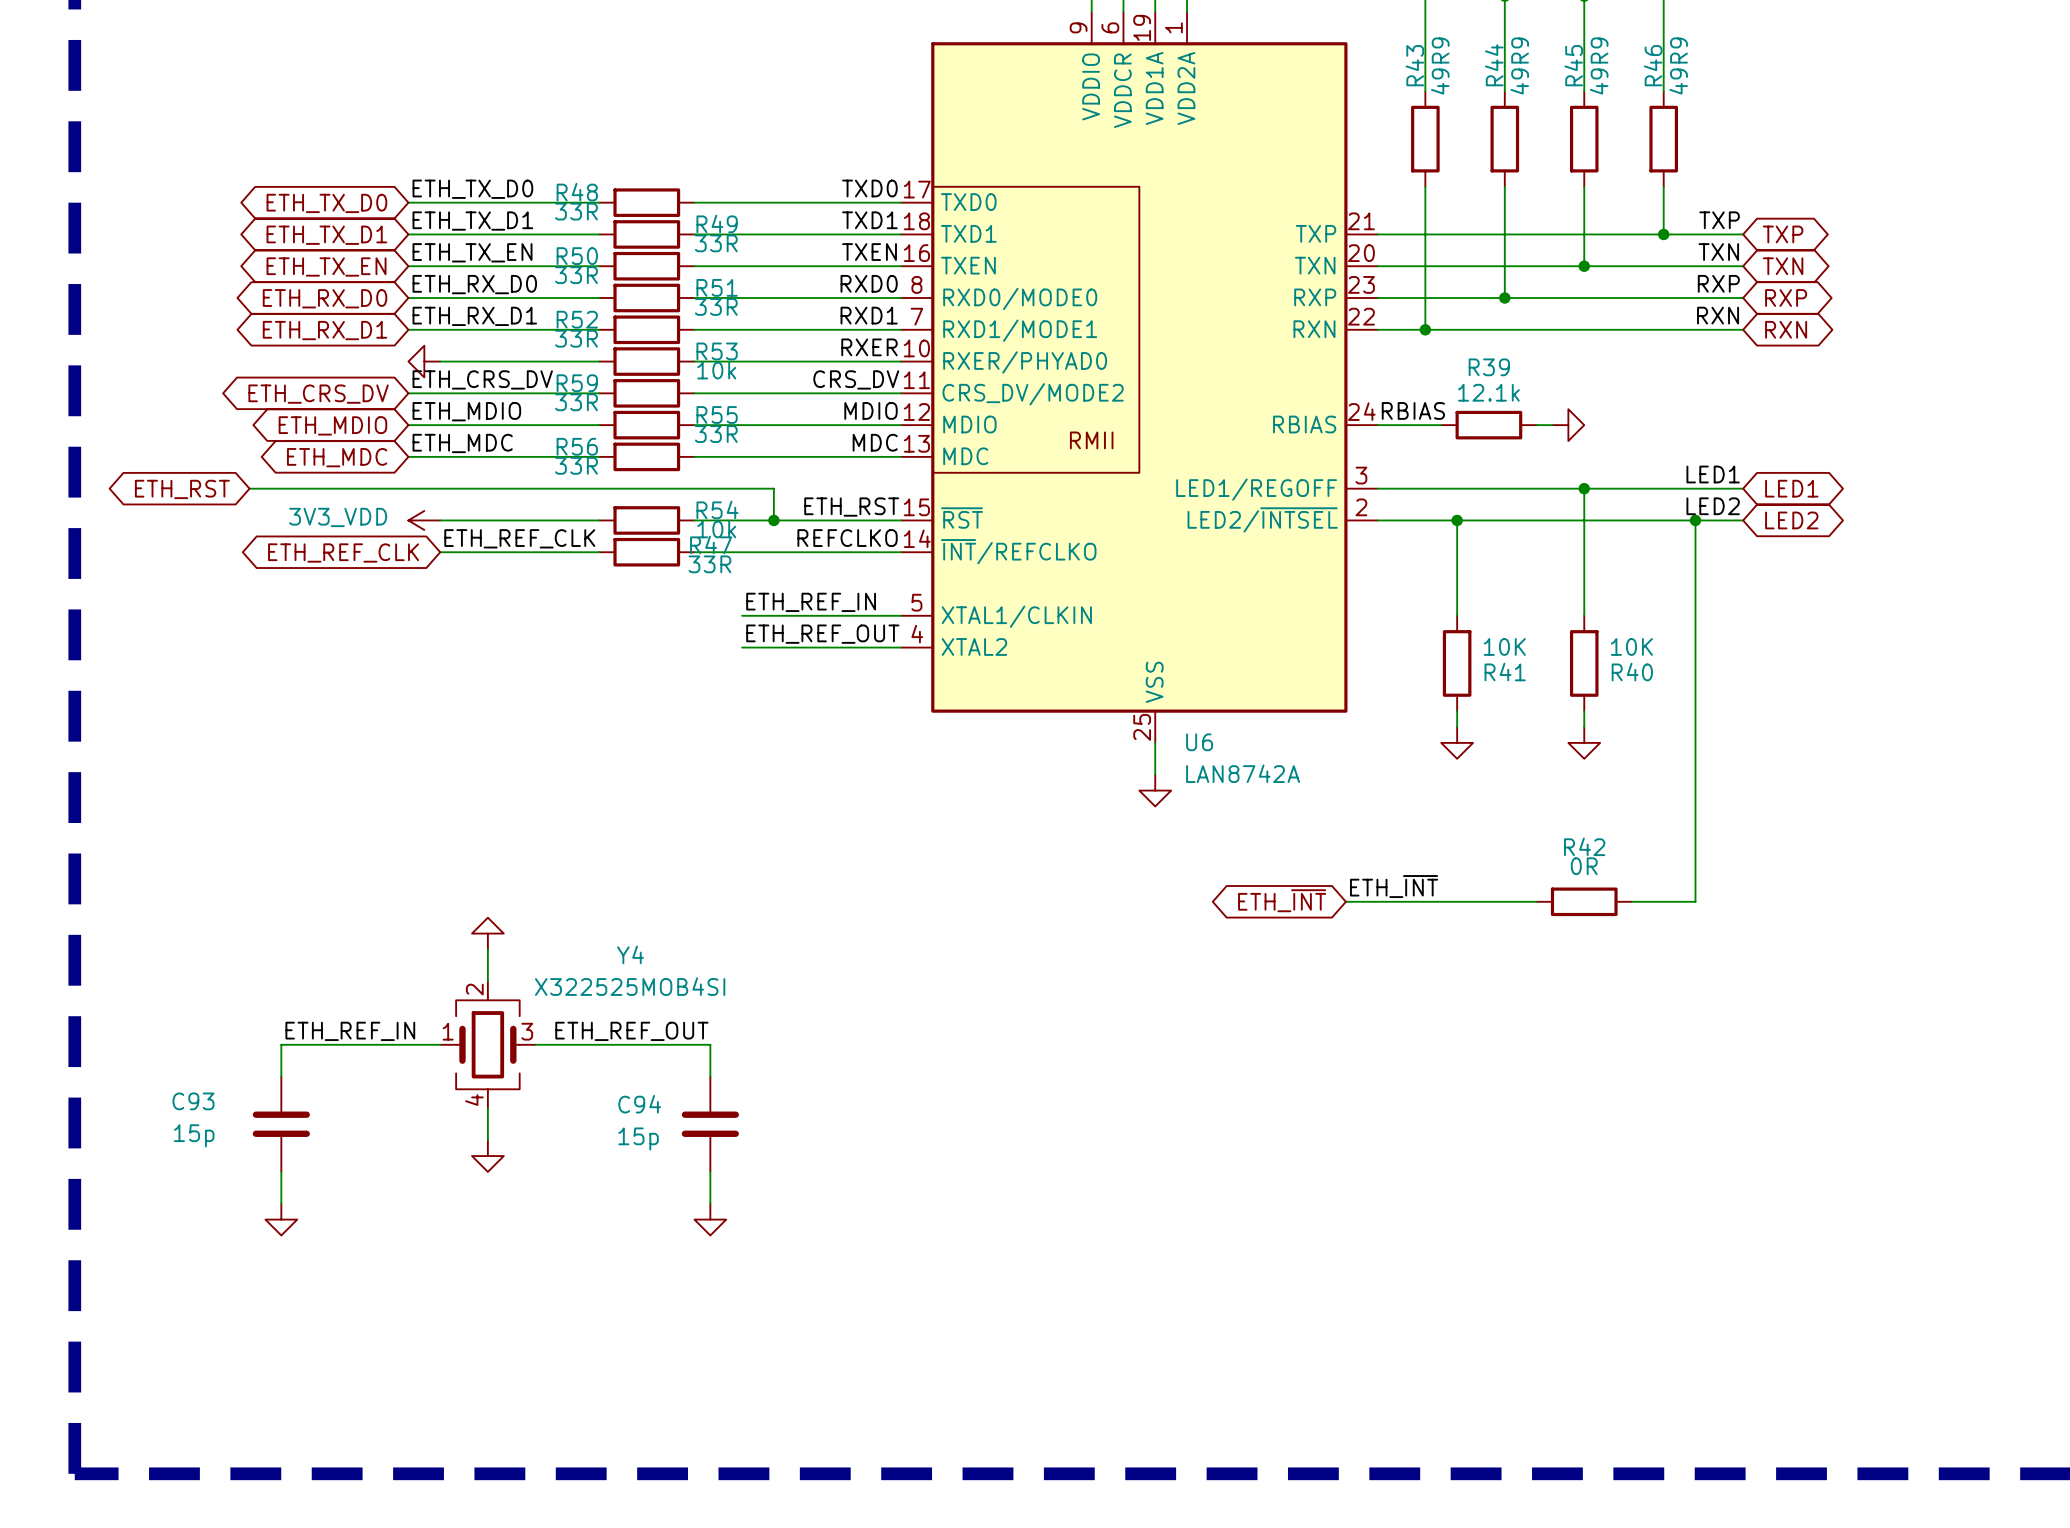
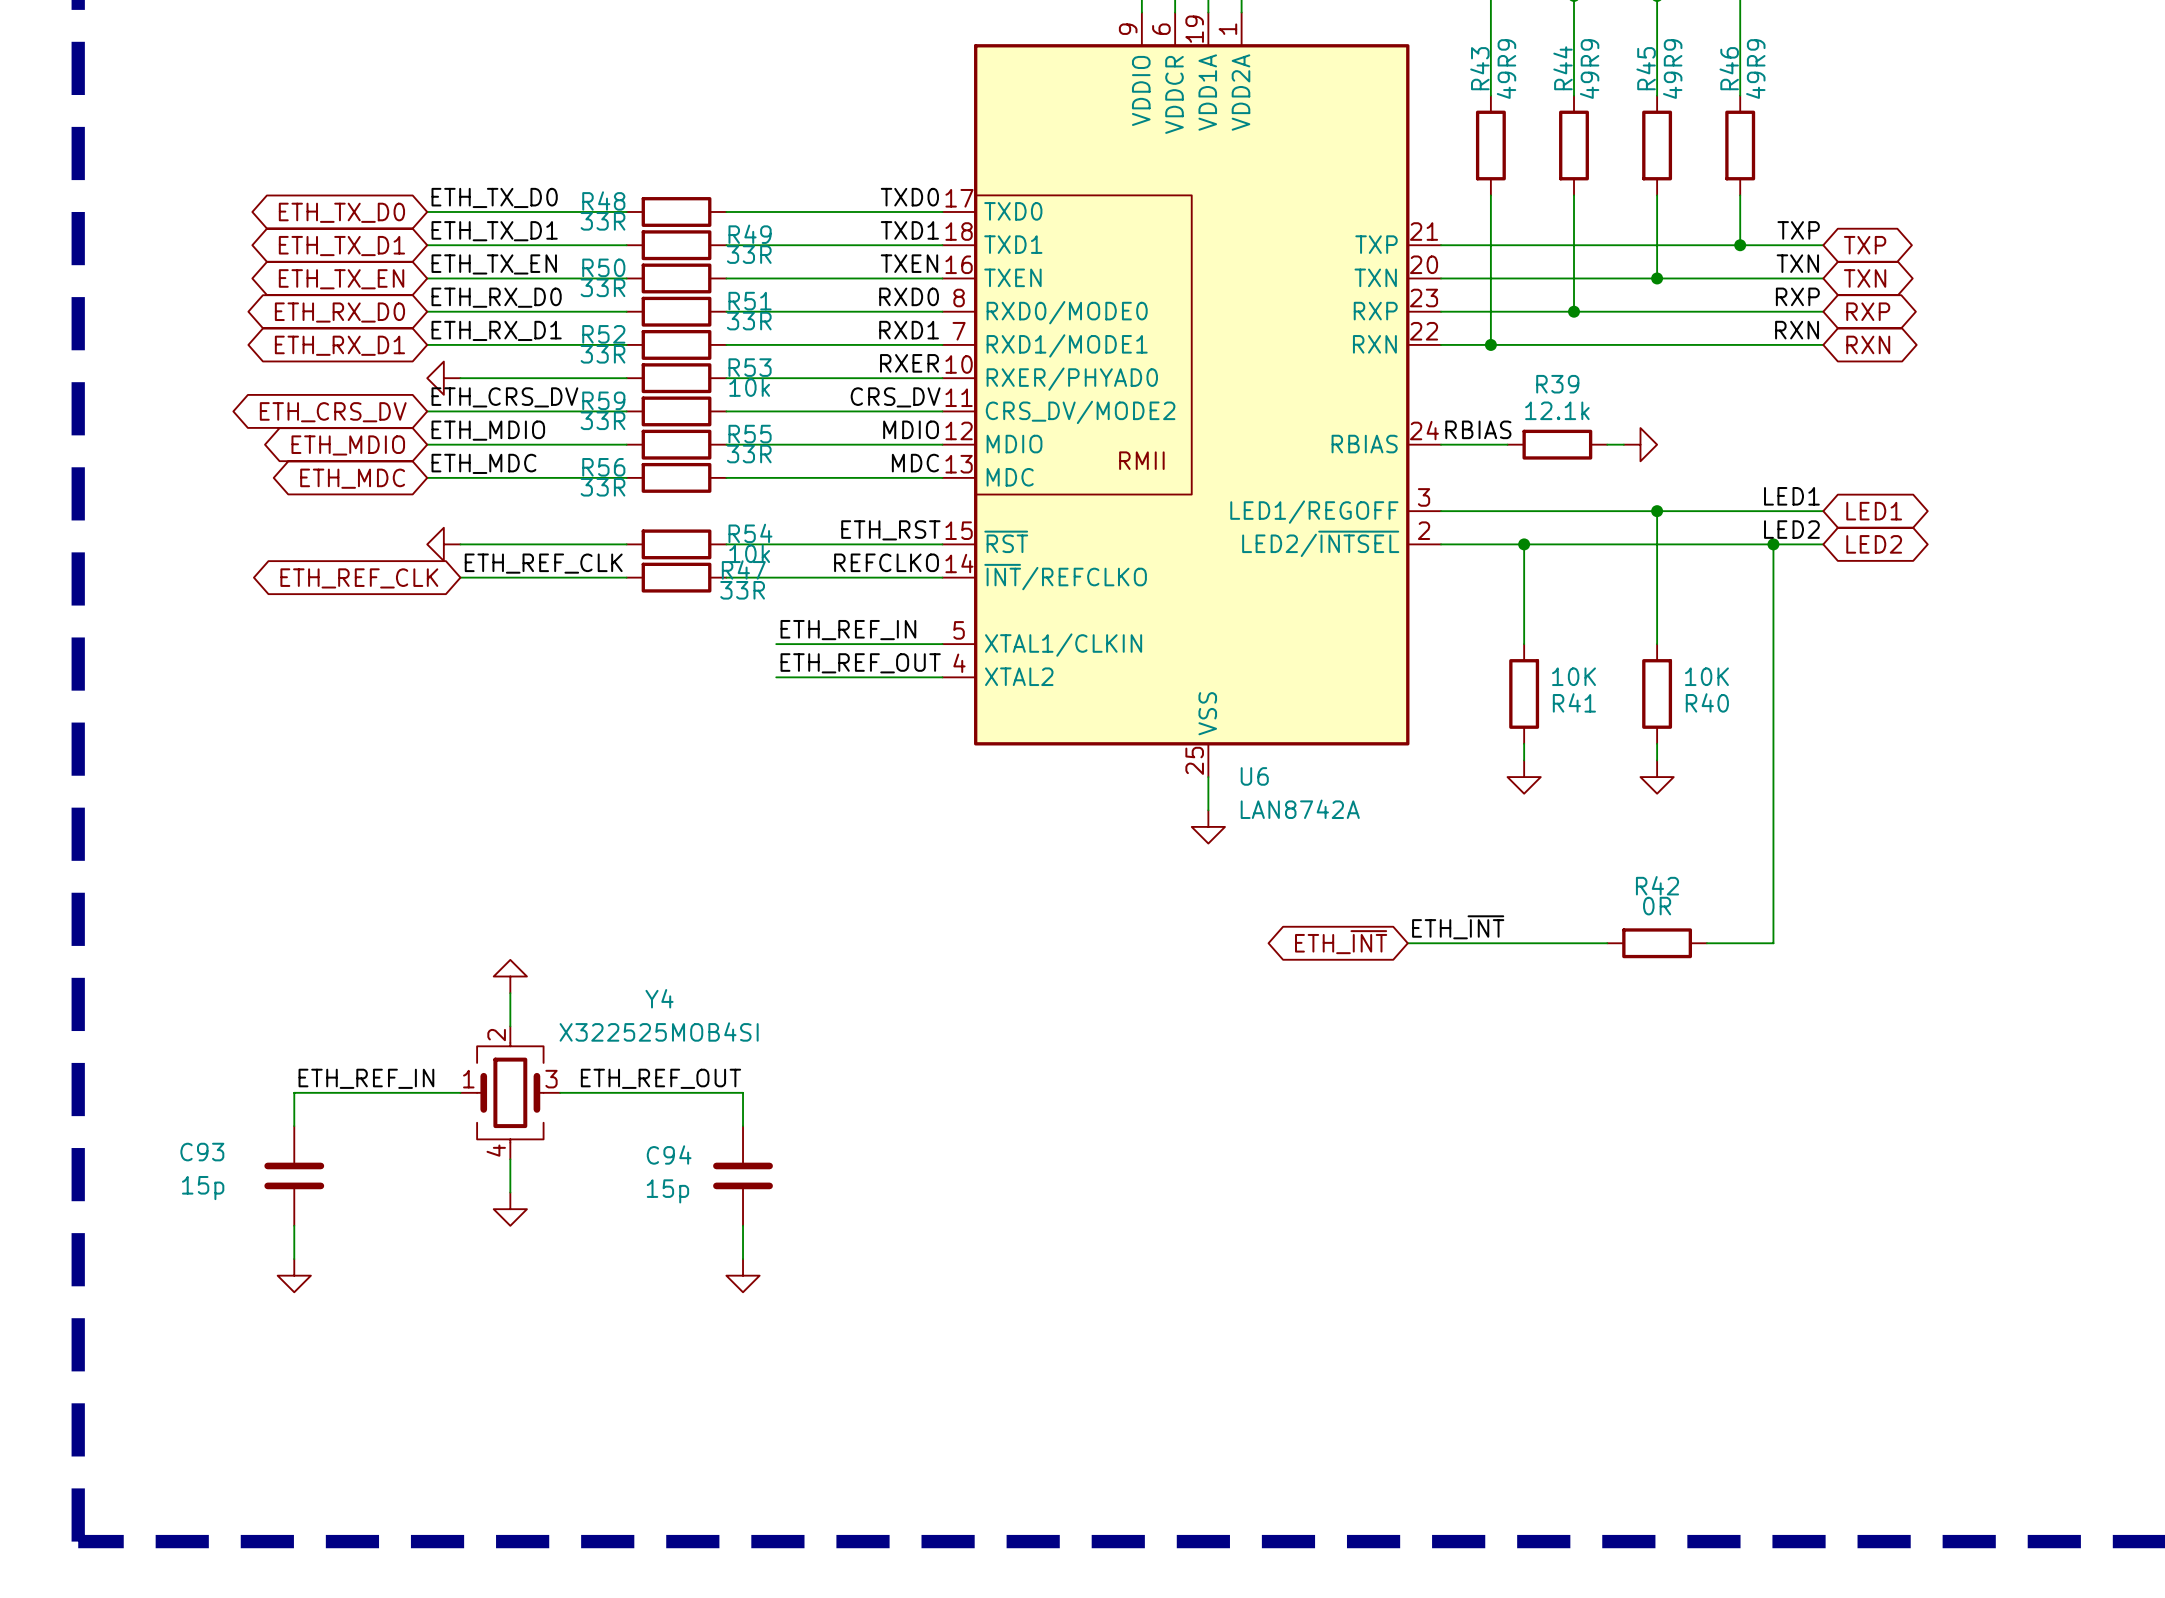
wire: (249, 488) (773, 488) (773, 520) -> none
global label: ETH_RST (182, 489) -> none
power symbol shape: [408, 510, 441, 530] -> [427, 527, 461, 562]
power symbol text: 3V3_VDD (338, 517) -> none
junction: (773, 520) -> none

